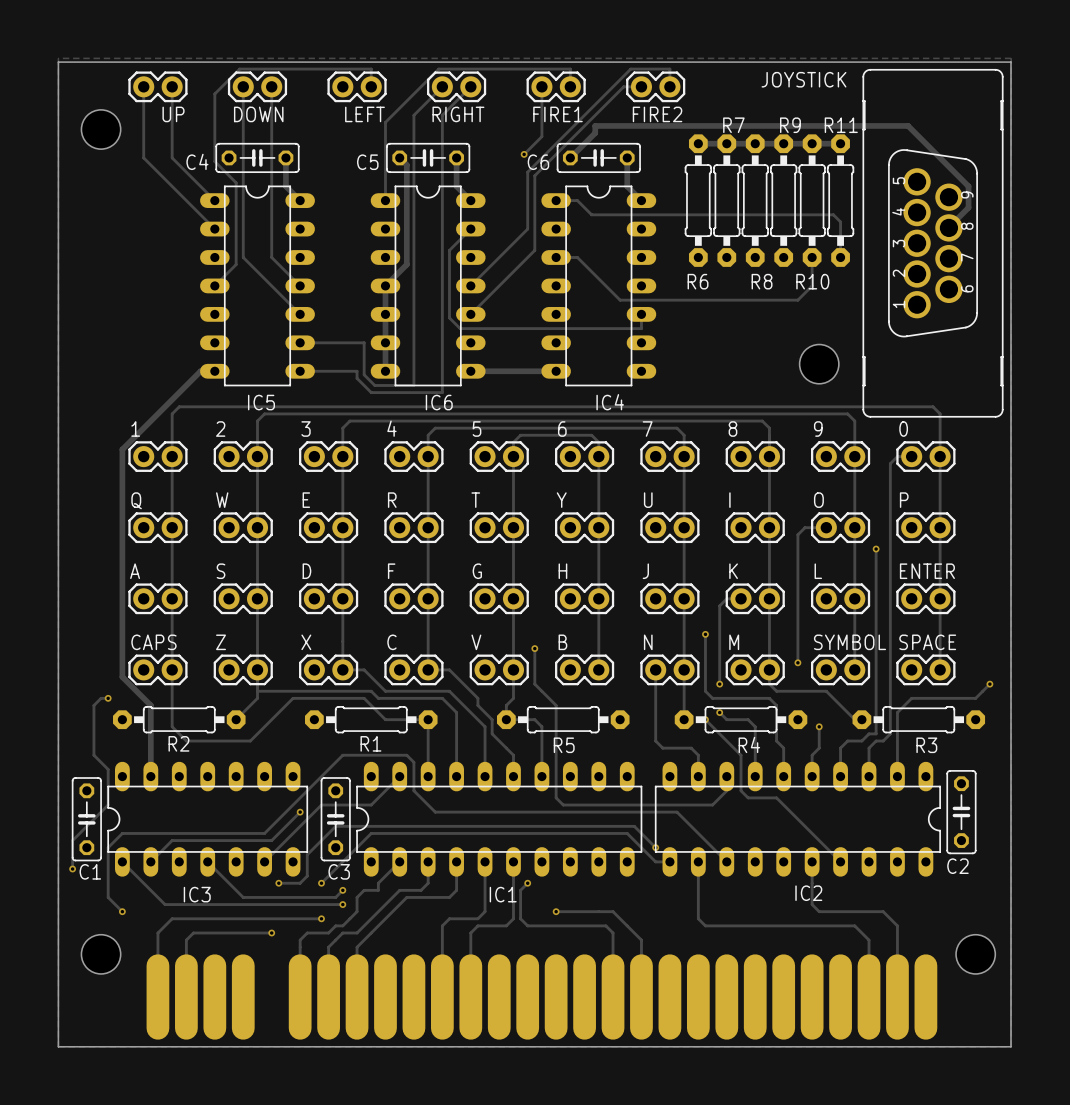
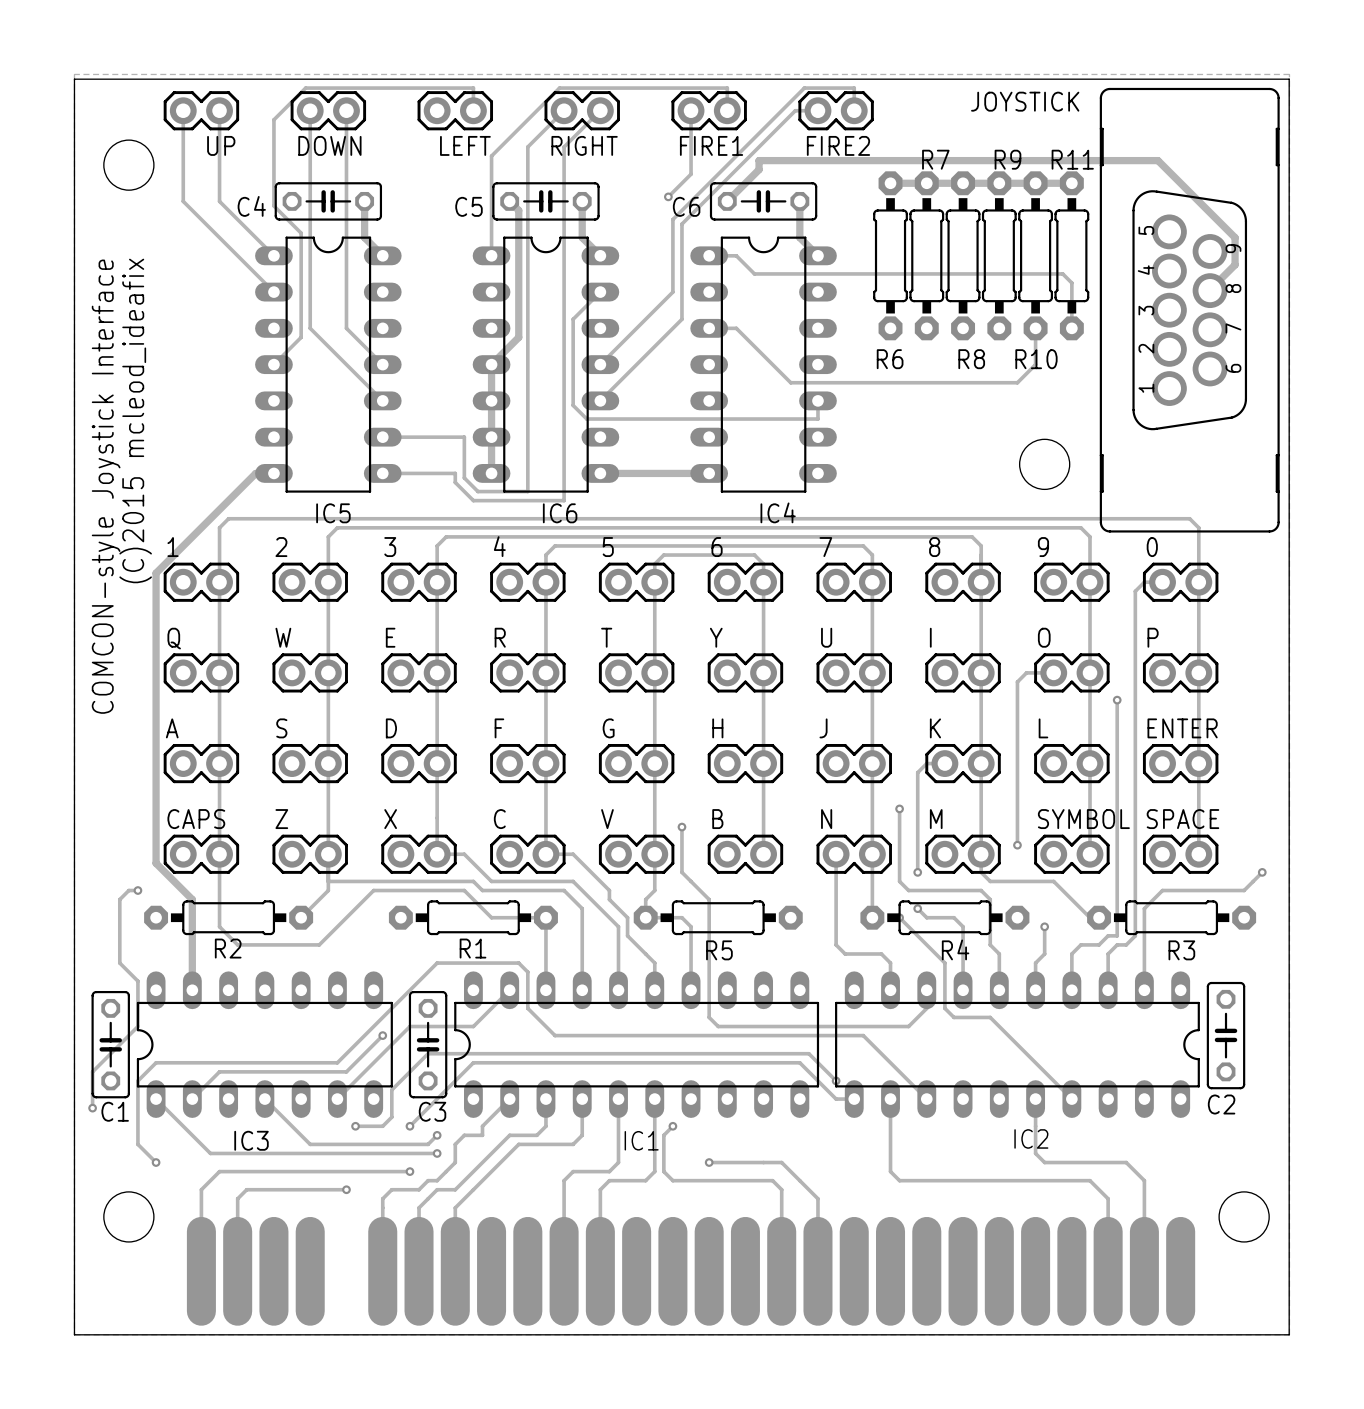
text: none -> (C)2015 mcleod_ideafix (135, 420)
text: none -> COMCON-style Joystick Interface (106, 486)

